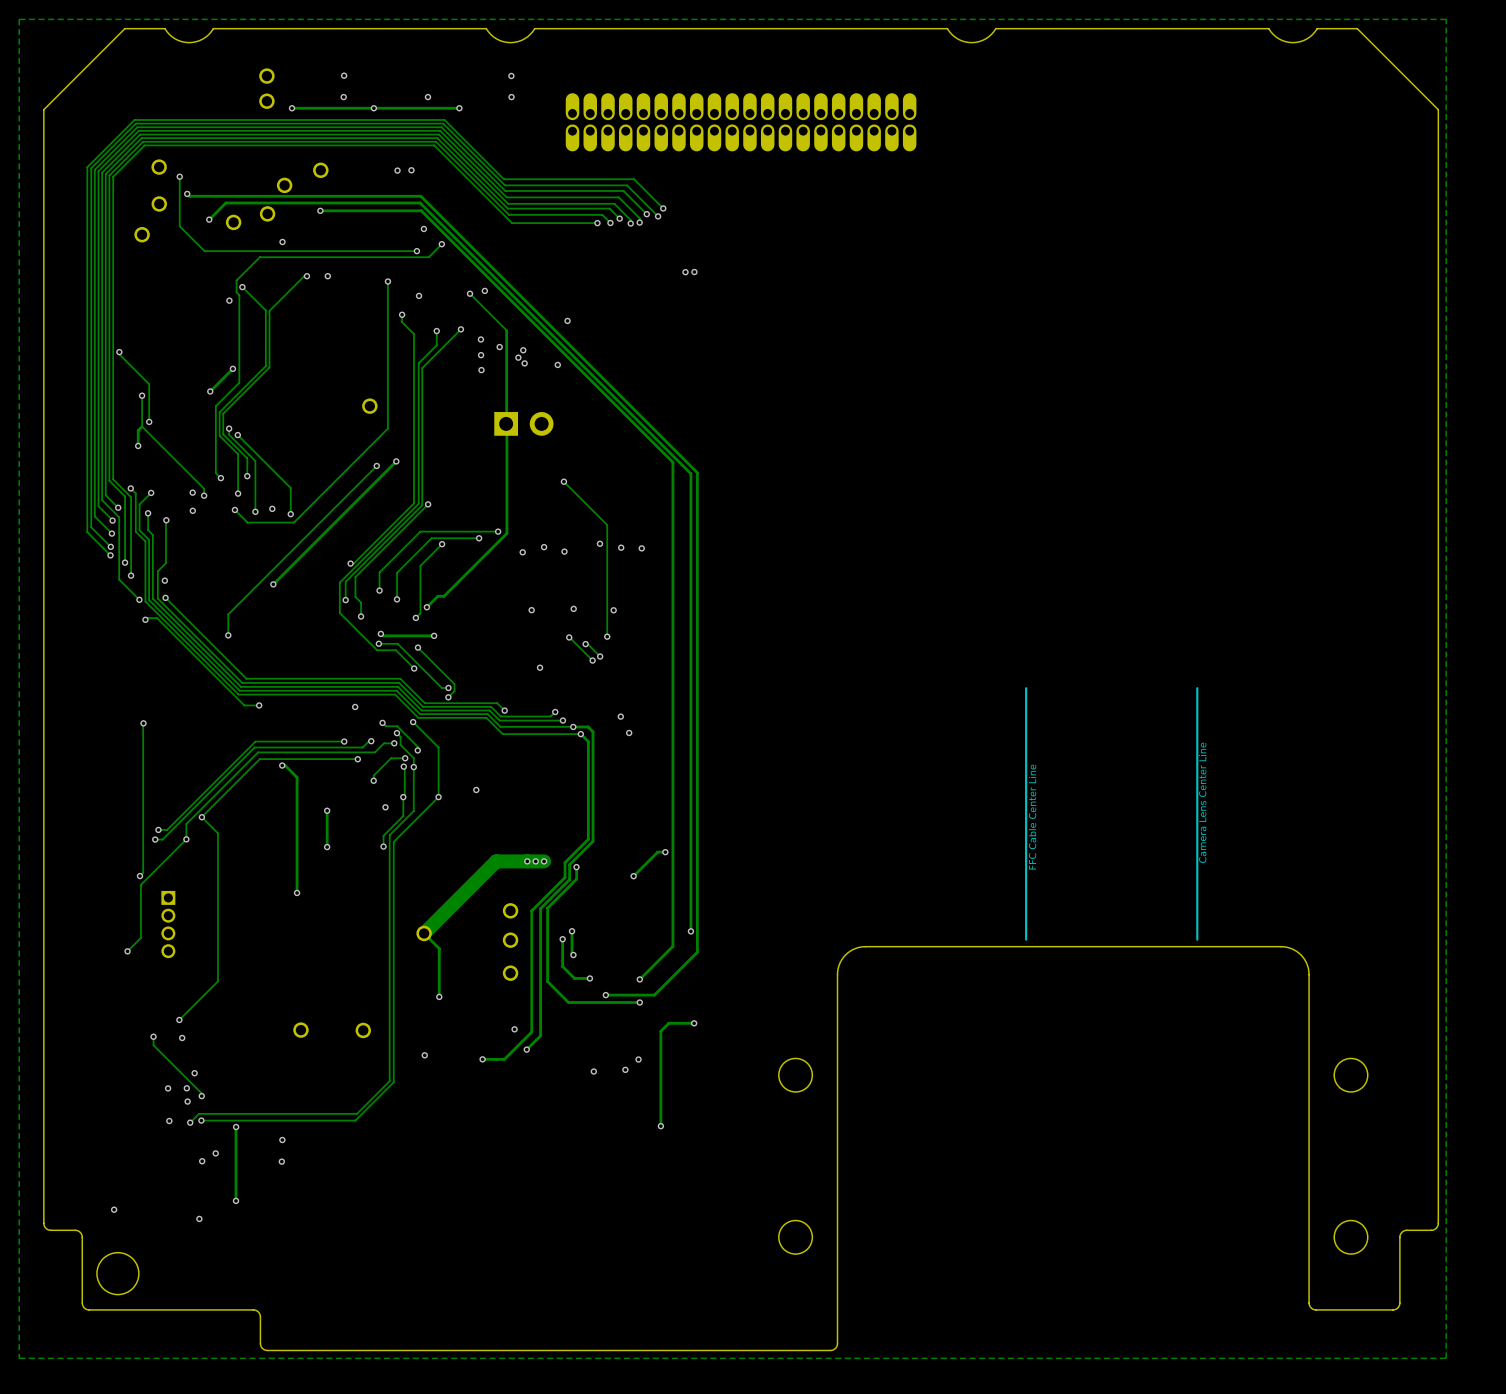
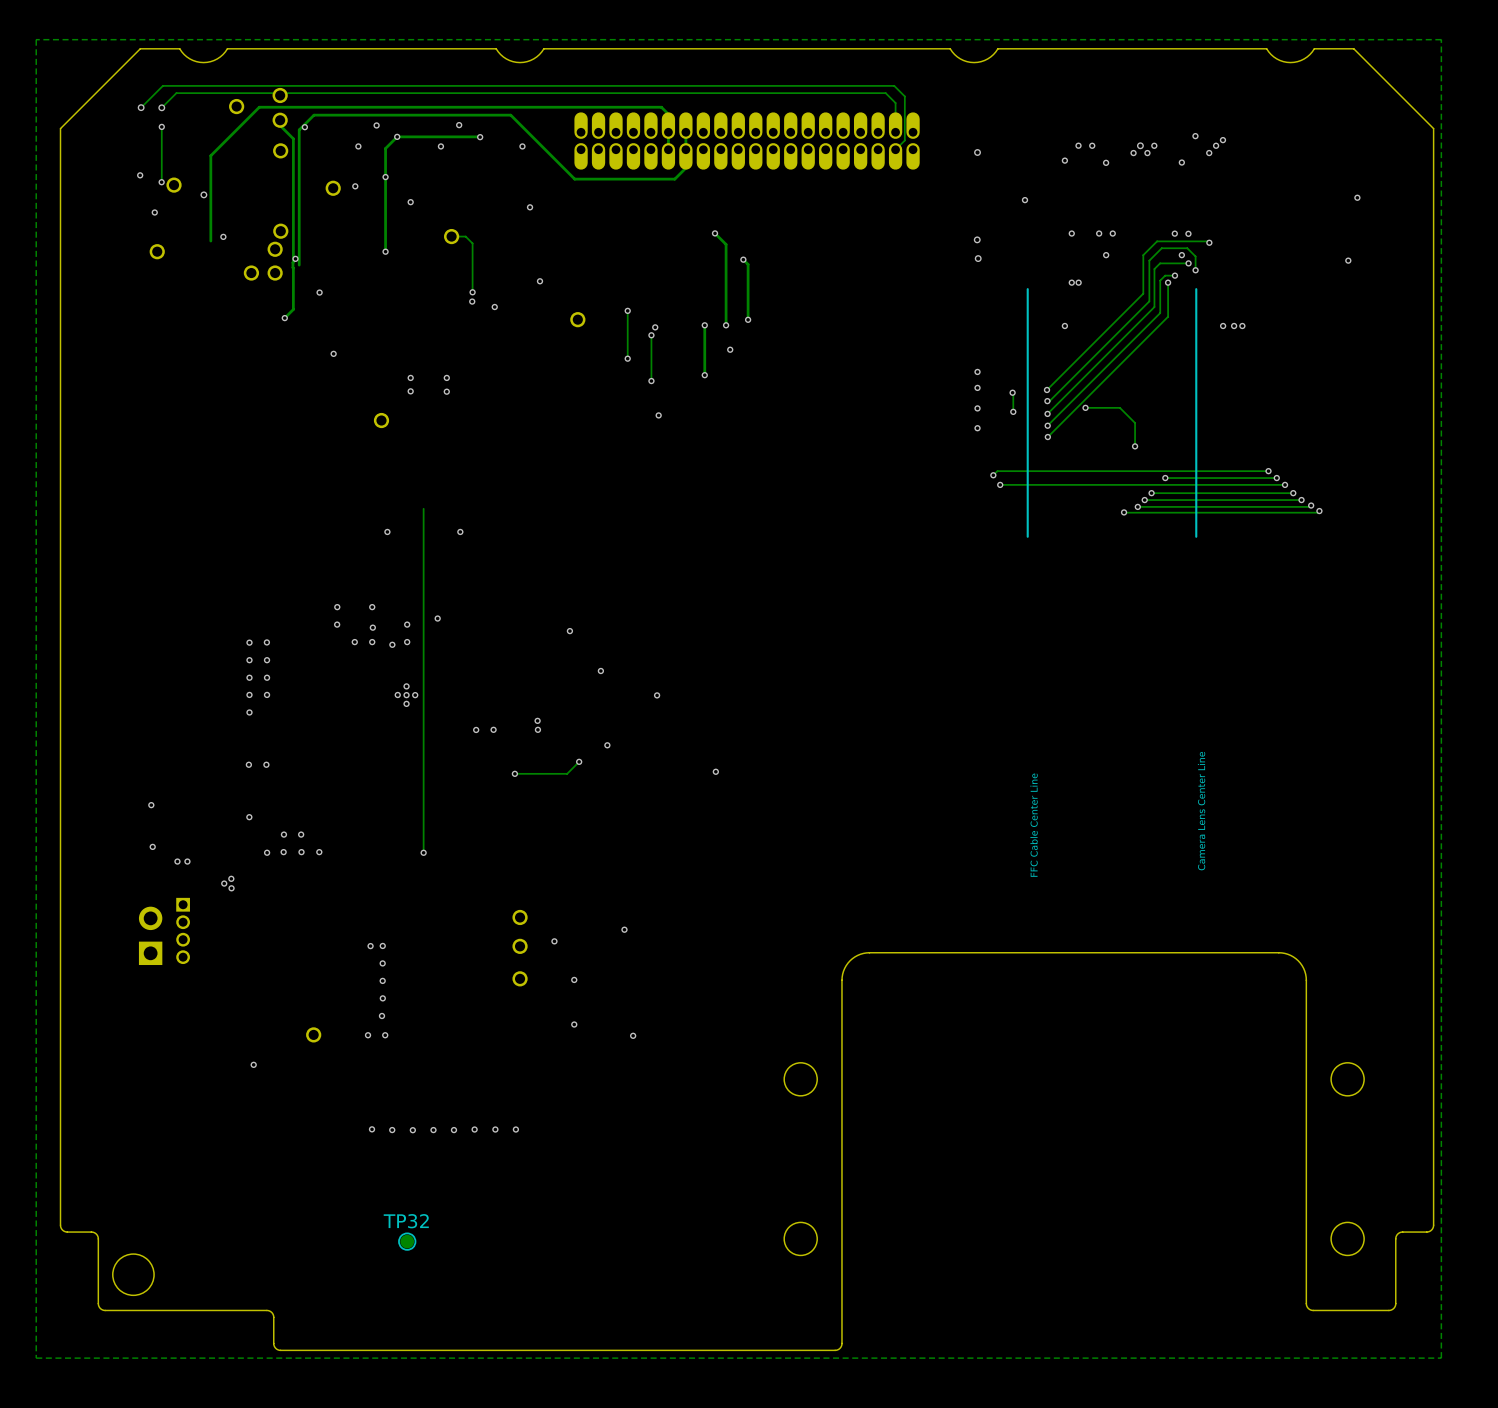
via: (344, 75) -> none
via: (511, 75) -> none
part: none -> (236, 106)
track: none -> (141, 107) (162, 85) (894, 85) (904, 96) (904, 140) (895, 149)
via: none -> (141, 107)
track: none -> (161, 107) (176, 93) (885, 93) (895, 103) (895, 132)
via: none -> (161, 107)
via: (343, 97) -> none
via: (427, 97) -> none
via: (511, 97) -> none
via: none -> (376, 125)
via: none -> (459, 125)
track: none -> (161, 126) (161, 182)
via: none -> (161, 126)
track: none -> (280, 126) (293, 138) (293, 309) (284, 318)
via: (373, 108) -> none
track: (459, 108) (292, 108) -> none
via: (459, 108) -> none
track: none -> (685, 132) (685, 168) (674, 179) (574, 179) (510, 115) (314, 115) (299, 129) (299, 265)
via: none -> (1195, 136)
via: none -> (397, 136)
track: none -> (480, 137) (397, 136) (385, 148) (385, 251)
via: none -> (480, 137)
via: none -> (1222, 140)
via: none -> (358, 146)
via: none -> (440, 146)
via: none -> (522, 146)
via: none -> (1078, 145)
via: none -> (1092, 145)
via: none -> (1140, 145)
via: none -> (1154, 145)
via: none -> (1216, 145)
track: none -> (668, 149) (668, 114) (661, 107) (259, 107) (210, 155) (210, 241)
part: none -> (280, 150)
via: none -> (977, 152)
via: none -> (1133, 153)
via: none -> (1147, 153)
via: none -> (1209, 153)
via: none -> (1064, 160)
via: none -> (1106, 162)
via: none -> (1181, 162)
via: none -> (140, 175)
via: none -> (385, 177)
via: none -> (161, 182)
via: none -> (355, 186)
via: (397, 170) -> none
via: (411, 170) -> none
track: (179, 176) (179, 226) (204, 251) (416, 251) -> none
via: (179, 176) -> none
via: none -> (203, 194)
via: none -> (1357, 197)
via: none -> (1024, 200)
via: none -> (410, 202)
part: (284, 185) -> none
via: none -> (530, 207)
track: (187, 193) (189, 196) (420, 196) (697, 472) (697, 952) (654, 995) (605, 995) -> none
via: (187, 193) -> none
via: none -> (154, 212)
part: (159, 203) -> none
track: (663, 208) (634, 179) (503, 179) (444, 119) (134, 119) (87, 167) (87, 532) (110, 555) -> none
via: (663, 208) -> none
track: (320, 210) (421, 210) (672, 462) (672, 946) (639, 979) -> none
via: (320, 210) -> none
track: (646, 214) (623, 190) (505, 190) (441, 127) (137, 127) (94, 169) (94, 516) (111, 533) -> none
via: (646, 214) -> none
track: (658, 216) (627, 185) (504, 185) (443, 123) (135, 123) (91, 168) (91, 527) (110, 546) -> none
via: (658, 216) -> none
track: none -> (715, 233) (726, 244) (726, 325)
via: none -> (715, 233)
via: none -> (1071, 233)
via: none -> (1099, 233)
via: none -> (1112, 233)
via: none -> (1174, 233)
via: none -> (1188, 233)
track: (619, 218) (609, 208) (507, 208) (437, 138) (141, 138) (105, 174) (105, 495) (118, 507) -> none
via: (619, 218) -> none
track: (209, 219) (225, 202) (420, 202) (690, 473) (690, 931) -> none
track: none -> (451, 236) (465, 236) (472, 243) (472, 292)
part: none -> (451, 236)
part: (233, 222) -> none
track: (610, 222) (602, 214) (509, 214) (435, 141) (143, 141) (109, 175) (109, 480) (125, 496) (125, 562) -> none
via: (610, 222) -> none
track: (639, 222) (639, 218) (618, 197) (506, 197) (440, 130) (138, 130) (98, 171) (98, 506) (111, 518) -> none
via: (639, 222) -> none
via: none -> (977, 239)
track: (597, 223) (512, 223) (434, 145) (144, 145) (113, 176) (113, 479) (131, 497) (131, 575) -> none
via: (597, 223) -> none
track: (630, 223) (630, 220) (614, 203) (508, 203) (438, 134) (140, 134) (102, 172) (102, 500) (119, 517) (119, 579) (139, 599) -> none
via: (630, 223) -> none
track: none -> (1209, 242) (1157, 241) (1143, 255) (1143, 293) (1047, 389)
via: none -> (1209, 242)
via: (423, 228) -> none
part: none -> (275, 249)
via: none -> (385, 251)
via: none -> (1106, 255)
via: none -> (1181, 255)
via: none -> (978, 258)
track: none -> (743, 259) (748, 264) (748, 319)
via: none -> (743, 259)
via: none -> (1348, 260)
track: (441, 244) (428, 257) (259, 257) (236, 280) (236, 292) (239, 295) (239, 382) (215, 406) (215, 473) (220, 478) -> none
via: (441, 244) -> none
track: none -> (1188, 263) (1160, 263) (1154, 269) (1154, 307) (1047, 413)
via: none -> (1188, 263)
via: (416, 251) -> none
track: none -> (1195, 270) (1195, 256) (1187, 248) (1161, 248) (1149, 260) (1149, 301) (1049, 401) (1047, 401)
via: none -> (1195, 270)
part: none -> (251, 273)
part: none -> (275, 273)
track: none -> (1174, 275) (1165, 275) (1160, 280) (1160, 313) (1047, 425)
via: none -> (1174, 275)
via: none -> (540, 281)
via: none -> (1071, 282)
via: none -> (1078, 282)
track: none -> (1168, 282) (1168, 316) (1047, 437)
via: none -> (1168, 282)
via: (685, 272) -> none
via: (694, 272) -> none
line: none -> (1027, 289) (1027, 536)
line: none -> (1196, 289) (1196, 536)
via: none -> (472, 292)
track: (306, 276) (304, 276) (269, 310) (269, 367) (223, 413) (223, 434) (247, 458) (247, 476) -> none
via: (327, 276) -> none
track: (387, 281) (387, 428) (293, 522) (247, 522) (234, 509) -> none
via: (387, 281) -> none
via: none -> (472, 301)
track: (242, 287) (265, 310) (265, 366) (219, 412) (219, 435) (238, 454) (238, 493) -> none
via: (242, 287) -> none
track: (470, 293) (506, 330) (506, 533) (444, 596) (437, 596) (426, 607) -> none
via: (470, 293) -> none
track: none -> (627, 310) (627, 358)
via: none -> (627, 310)
via: (419, 295) -> none
via: (229, 300) -> none
via: none -> (284, 318)
part: none -> (577, 319)
via: none -> (748, 319)
track: none -> (704, 325) (704, 375)
via: none -> (704, 325)
via: none -> (726, 325)
via: none -> (1064, 325)
via: none -> (1223, 325)
via: none -> (1234, 325)
via: none -> (1242, 325)
via: none -> (655, 327)
track: (402, 314) (402, 322) (414, 334) (414, 503) (353, 563) (350, 563) -> none
via: (402, 314) -> none
track: none -> (651, 335) (651, 381)
via: none -> (651, 335)
via: (567, 320) -> none
track: (460, 329) (422, 368) (422, 505) (345, 581) (345, 600) -> none
via: (460, 329) -> none
track: (436, 331) (436, 345) (418, 363) (418, 503) (339, 582) (339, 613) (377, 650) (395, 650) (414, 668) -> none
via: (436, 331) -> none
via: none -> (730, 349)
via: none -> (333, 353)
via: (480, 339) -> none
via: none -> (627, 358)
via: (499, 347) -> none
via: (523, 350) -> none
track: (119, 352) (119, 354) (149, 384) (149, 421) -> none
via: (119, 352) -> none
via: (481, 355) -> none
via: none -> (977, 371)
via: (518, 357) -> none
via: none -> (704, 375)
via: none -> (410, 377)
via: none -> (446, 377)
via: (524, 363) -> none
via: (557, 364) -> none
via: none -> (651, 381)
track: (232, 368) (210, 391) -> none
via: (232, 368) -> none
via: (481, 370) -> none
via: none -> (977, 387)
via: none -> (1047, 389)
via: none -> (410, 391)
via: none -> (446, 391)
track: none -> (1012, 392) (1013, 411)
via: none -> (1012, 392)
via: none -> (1047, 401)
via: (210, 391) -> none
via: none -> (977, 408)
track: none -> (1085, 407) (1119, 407) (1135, 422) (1135, 446)
via: none -> (1085, 407)
track: (142, 395) (142, 426) -> none
via: (142, 395) -> none
via: none -> (1013, 411)
via: none -> (1047, 413)
via: none -> (658, 415)
via: none -> (1047, 425)
via: none -> (977, 428)
via: (149, 421) -> none
via: none -> (1047, 437)
part: (523, 423) -> none
track: (142, 426) (138, 430) (138, 445) -> none
track: (142, 426) (204, 488) (204, 495) -> none
track: (229, 428) (229, 434) (255, 461) (255, 511) -> none
via: (229, 428) -> none
via: none -> (1135, 446)
track: (237, 435) (290, 488) (290, 514) -> none
via: (237, 435) -> none
via: (138, 445) -> none
track: none -> (1268, 471) (997, 471) (993, 475)
via: none -> (1268, 471)
track: (396, 461) (273, 584) -> none
via: (396, 461) -> none
via: none -> (993, 475)
via: none -> (1165, 478)
track: none -> (1276, 478) (1165, 478)
via: none -> (1276, 478)
track: (376, 465) (228, 614) (228, 635) -> none
via: (376, 465) -> none
via: none -> (1000, 484)
track: none -> (1285, 484) (1000, 484)
via: none -> (1285, 484)
via: (247, 476) -> none
via: (220, 478) -> none
via: none -> (1151, 493)
track: none -> (1293, 493) (1151, 493)
via: none -> (1293, 493)
track: (563, 481) (607, 525) (607, 636) -> none
via: (563, 481) -> none
via: none -> (1144, 500)
track: none -> (1301, 500) (1144, 500)
via: none -> (1301, 500)
track: (130, 488) (135, 493) (135, 531) (145, 541) (145, 601) (238, 694) (395, 694) (418, 717) (486, 717) (502, 734) (580, 734) (588, 741) (588, 839) (565, 862) (565, 877) (531, 910) (531, 1031) (504, 1059) (482, 1059) -> none
via: (130, 488) -> none
track: (151, 492) (139, 504) (139, 530) (149, 539) (149, 600) (239, 690) (396, 690) (420, 714) (487, 714) (500, 726) (573, 726) -> none
via: (151, 492) -> none
via: (192, 492) -> none
track: none -> (1311, 505) (1137, 506)
via: none -> (1311, 505)
via: (238, 493) -> none
via: none -> (1137, 506)
via: (204, 495) -> none
track: none -> (423, 508) (423, 852)
track: none -> (1319, 511) (1317, 512) (1124, 512)
via: none -> (1319, 511)
via: none -> (1124, 512)
track: (428, 504) (355, 577) (355, 596) (361, 602) (361, 616) -> none
via: (428, 504) -> none
via: (118, 507) -> none
via: (272, 508) -> none
via: (234, 509) -> none
via: (192, 510) -> none
via: (255, 511) -> none
track: (148, 513) (148, 530) (152, 534) (152, 598) (241, 686) (398, 686) (421, 710) (489, 710) (499, 720) (562, 720) -> none
via: (148, 513) -> none
via: (290, 514) -> none
via: none -> (387, 531)
via: none -> (460, 531)
via: (112, 520) -> none
track: (166, 520) (165, 563) (157, 571) (157, 598) (242, 682) (399, 682) (423, 706) (491, 706) (500, 716) (550, 716) (555, 712) -> none
via: (166, 520) -> none
track: (498, 531) (420, 531) (379, 572) (379, 590) -> none
via: (498, 531) -> none
via: (111, 533) -> none
track: (479, 538) (431, 538) (397, 572) (397, 599) -> none
via: (479, 538) -> none
via: (599, 543) -> none
track: (442, 544) (420, 565) (420, 613) (415, 617) -> none
via: (442, 544) -> none
via: (110, 546) -> none
via: (544, 547) -> none
via: (621, 547) -> none
via: (641, 548) -> none
via: (564, 551) -> none
via: (522, 552) -> none
via: (110, 555) -> none
via: (125, 562) -> none
via: (350, 563) -> none
via: (131, 575) -> none
via: (164, 580) -> none
via: (273, 584) -> none
via: (379, 590) -> none
via: none -> (337, 607)
via: none -> (372, 607)
track: (165, 597) (246, 678) (400, 678) (424, 703) (497, 703) (504, 710) -> none
via: (165, 597) -> none
via: (139, 599) -> none
via: (397, 599) -> none
via: (345, 600) -> none
via: (573, 608) -> none
via: (531, 610) -> none
via: (613, 610) -> none
via: none -> (337, 624)
via: none -> (407, 624)
via: (415, 617) -> none
track: (145, 619) (157, 618) (244, 705) (259, 705) -> none
via: (145, 619) -> none
via: none -> (569, 631)
via: none -> (249, 642)
via: none -> (266, 642)
via: none -> (354, 642)
via: none -> (372, 642)
via: none -> (407, 642)
track: (380, 633) (382, 635) (434, 635) -> none
via: (228, 635) -> none
via: (434, 635) -> none
via: (607, 636) -> none
track: (569, 637) (592, 660) -> none
via: (569, 637) -> none
track: (378, 643) (397, 643) (441, 687) (448, 687) -> none
via: (378, 643) -> none
track: (585, 644) (600, 656) -> none
via: (585, 644) -> none
track: (417, 647) (454, 684) (454, 691) (448, 697) -> none
via: (417, 647) -> none
via: none -> (249, 660)
via: none -> (267, 660)
via: (600, 656) -> none
via: none -> (249, 677)
via: none -> (267, 677)
via: (540, 667) -> none
via: (414, 668) -> none
via: none -> (406, 686)
via: none -> (249, 694)
via: none -> (267, 694)
via: none -> (397, 695)
via: none -> (406, 695)
via: none -> (415, 695)
via: none -> (657, 695)
via: (448, 687) -> none
line: (1026, 688) (1026, 939) -> none
line: (1197, 688) (1197, 939) -> none
via: none -> (406, 703)
via: (448, 697) -> none
via: none -> (249, 712)
via: (259, 705) -> none
via: (355, 706) -> none
via: (504, 710) -> none
via: none -> (537, 720)
via: (555, 712) -> none
via: (620, 716) -> none
via: none -> (476, 729)
via: none -> (493, 729)
via: none -> (537, 729)
via: (562, 720) -> none
track: (382, 722) (385, 726) (397, 726) (417, 746) (417, 750) -> none
via: (382, 722) -> none
track: (413, 722) (438, 747) (438, 797) (393, 841) (393, 1082) (355, 1120) (201, 1120) -> none
via: (413, 722) -> none
track: (143, 723) (143, 872) (139, 876) -> none
via: (143, 723) -> none
track: (573, 726) (588, 726) (592, 731) (592, 841) (569, 864) (569, 879) (540, 908) (540, 1035) (526, 1049) -> none
via: (573, 726) -> none
via: (629, 732) -> none
track: (396, 733) (400, 736) (400, 744) (413, 758) (413, 811) (389, 835) (389, 1081) (356, 1113) (199, 1113) (190, 1122) -> none
via: (396, 733) -> none
via: (580, 734) -> none
via: none -> (607, 745)
track: (344, 741) (255, 741) (167, 829) (158, 829) -> none
via: (344, 741) -> none
track: (371, 741) (362, 747) (254, 747) (162, 839) (155, 839) -> none
via: (371, 741) -> none
track: (394, 743) (384, 743) (375, 752) (257, 752) (186, 824) (186, 839) (140, 884) (140, 937) (127, 951) -> none
via: (394, 743) -> none
via: (417, 750) -> none
track: none -> (579, 761) (567, 773) (514, 773)
via: none -> (579, 761)
via: none -> (248, 764)
via: none -> (266, 764)
track: (405, 758) (391, 758) (373, 775) (373, 780) -> none
via: (405, 758) -> none
track: (357, 759) (259, 759) (201, 816) -> none
via: (357, 759) -> none
via: none -> (715, 771)
via: none -> (514, 773)
track: (282, 765) (285, 765) (297, 777) (297, 892) -> none
via: (282, 765) -> none
track: (403, 766) (403, 816) (383, 835) (383, 846) -> none
via: (403, 766) -> none
via: (413, 767) -> none
via: (373, 780) -> none
via: (476, 789) -> none
via: none -> (151, 805)
via: (403, 797) -> none
via: (438, 797) -> none
via: (385, 807) -> none
via: none -> (249, 817)
track: (327, 810) (327, 847) -> none
via: (327, 810) -> none
track: (201, 817) (217, 833) (217, 981) (179, 1019) -> none
via: (201, 817) -> none
via: none -> (283, 834)
via: none -> (301, 834)
via: (158, 829) -> none
via: none -> (152, 846)
via: (155, 839) -> none
via: (186, 839) -> none
via: none -> (283, 852)
via: none -> (301, 852)
via: none -> (319, 852)
via: none -> (267, 852)
via: none -> (423, 852)
via: (383, 846) -> none
via: (327, 847) -> none
track: (665, 852) (657, 852) (633, 876) -> none
via: (665, 852) -> none
via: none -> (177, 861)
via: none -> (187, 861)
via: (527, 861) -> none
via: (535, 861) -> none
track: (544, 861) (496, 861) (424, 933) (439, 948) (439, 996) -> none
via: (544, 861) -> none
track: (576, 867) (576, 879) (547, 908) (547, 981) (568, 1002) (639, 1002) -> none
via: (576, 867) -> none
via: none -> (231, 878)
via: (139, 876) -> none
via: none -> (224, 883)
via: (633, 876) -> none
via: none -> (231, 888)
via: (297, 892) -> none
via: none -> (624, 929)
part: none -> (150, 935)
track: (572, 931) (573, 955) -> none
via: (572, 931) -> none
via: (690, 931) -> none
part: (424, 933) -> none
via: none -> (554, 941)
via: none -> (370, 946)
via: none -> (382, 945)
track: (562, 939) (562, 966) (574, 978) (589, 978) -> none
via: (562, 939) -> none
via: (127, 951) -> none
via: (573, 955) -> none
via: none -> (382, 963)
via: none -> (574, 979)
via: none -> (382, 980)
via: (589, 978) -> none
via: (639, 979) -> none
via: none -> (382, 998)
via: (605, 995) -> none
via: (439, 996) -> none
via: (639, 1002) -> none
via: none -> (381, 1015)
via: (179, 1019) -> none
via: none -> (574, 1024)
track: (694, 1023) (668, 1023) (660, 1031) (660, 1126) -> none
via: (694, 1023) -> none
via: (514, 1029) -> none
via: none -> (368, 1035)
part: (363, 1030) -> none
via: none -> (385, 1035)
via: none -> (633, 1035)
track: (153, 1036) (153, 1045) (201, 1093) (201, 1096) -> none
via: (153, 1036) -> none
via: (182, 1038) -> none
via: (526, 1049) -> none
via: (424, 1055) -> none
via: (482, 1059) -> none
via: (638, 1059) -> none
via: none -> (253, 1064)
via: (625, 1069) -> none
via: (593, 1071) -> none
via: (194, 1073) -> none
via: (168, 1088) -> none
via: (186, 1088) -> none
via: (201, 1096) -> none
via: (187, 1101) -> none
via: (169, 1120) -> none
via: (201, 1120) -> none
via: (190, 1122) -> none
via: none -> (372, 1129)
via: none -> (392, 1130)
via: none -> (412, 1130)
via: none -> (433, 1130)
via: none -> (453, 1130)
via: none -> (474, 1129)
via: none -> (495, 1129)
via: none -> (515, 1129)
via: (660, 1126) -> none
track: (235, 1127) (235, 1200) -> none
via: (236, 1127) -> none
via: (282, 1140) -> none
via: (215, 1153) -> none
via: (202, 1161) -> none
via: (281, 1161) -> none
via: (235, 1200) -> none
via: (114, 1209) -> none
via: (199, 1218) -> none
TP32: none -> (407, 1241)

